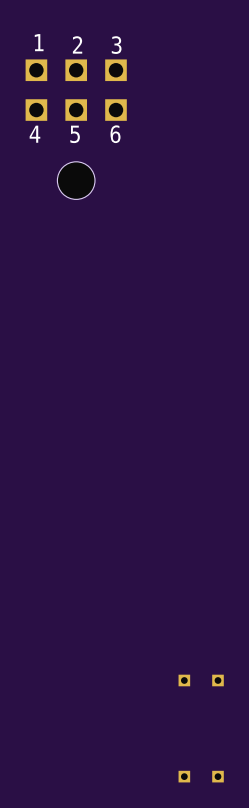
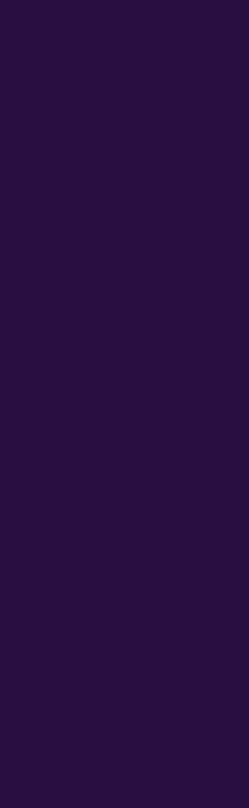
part: (76, 129) -> none
part: (201, 680) -> none
part: (201, 776) -> none

